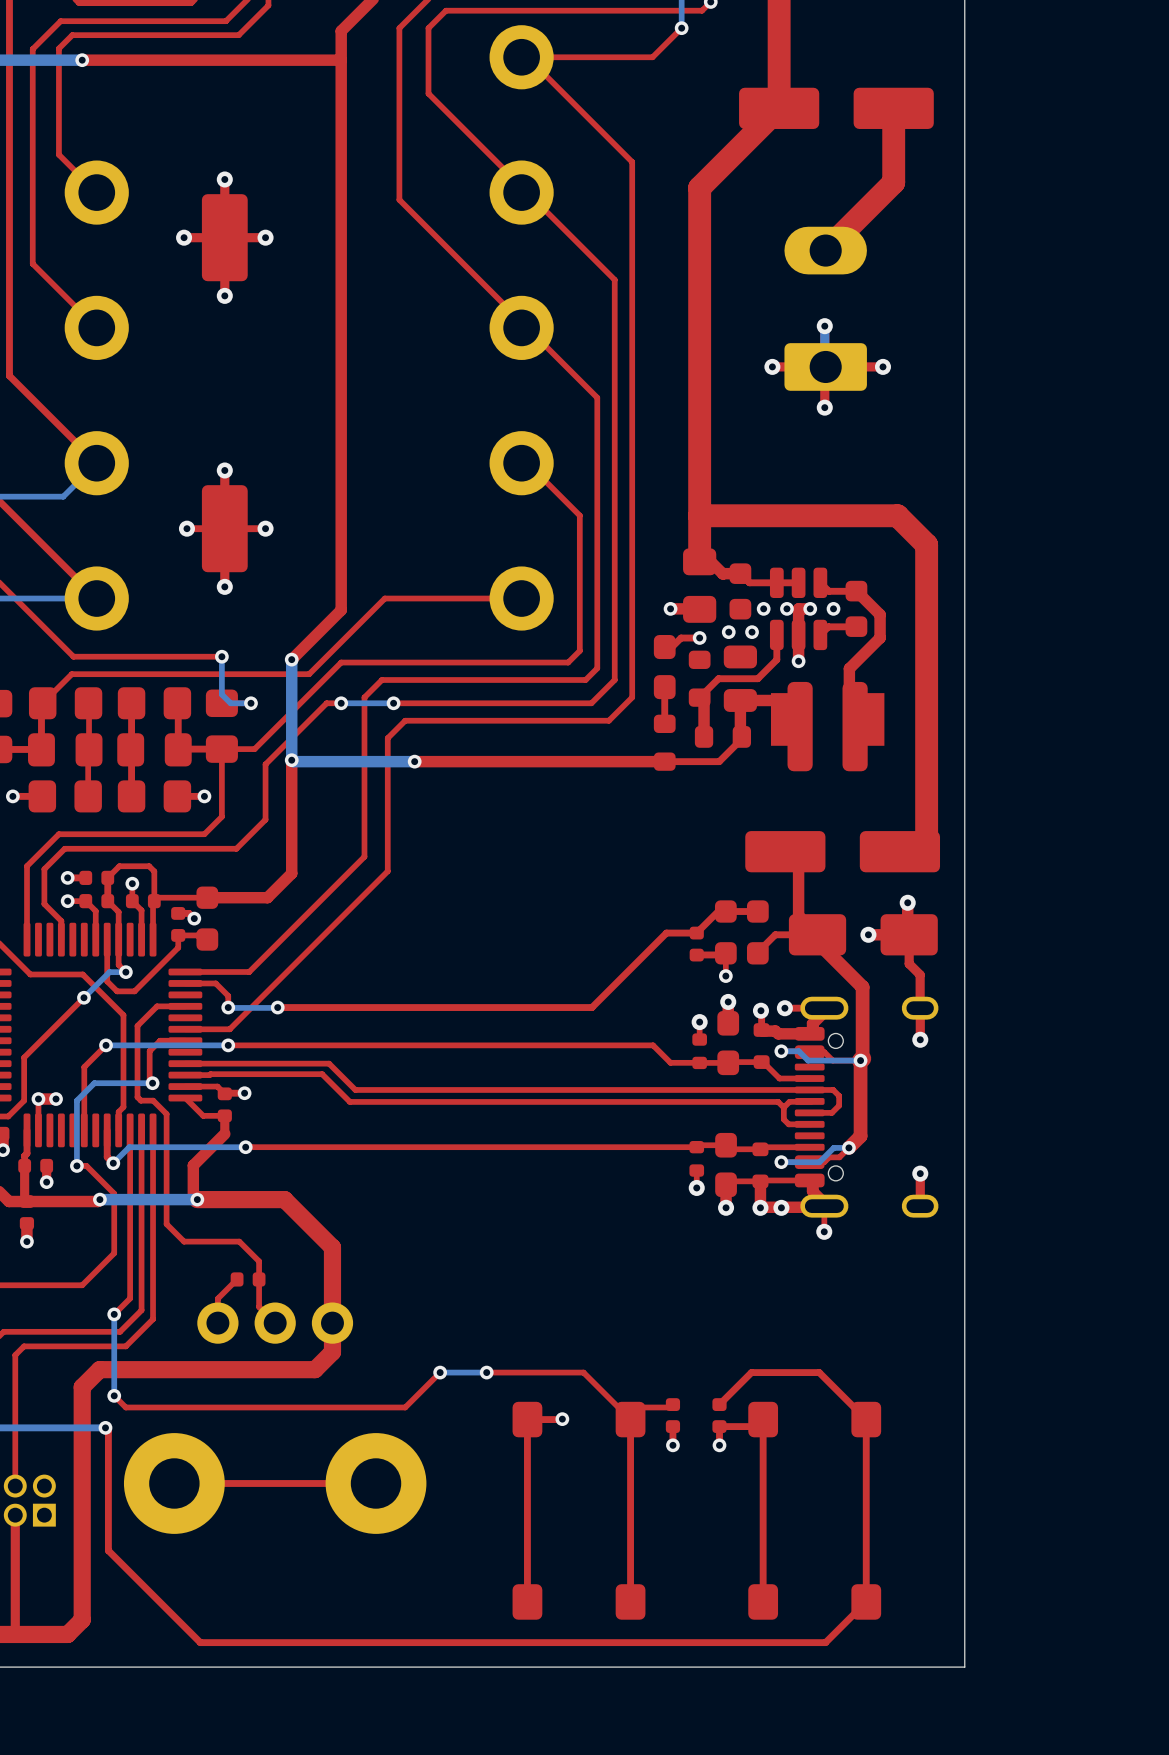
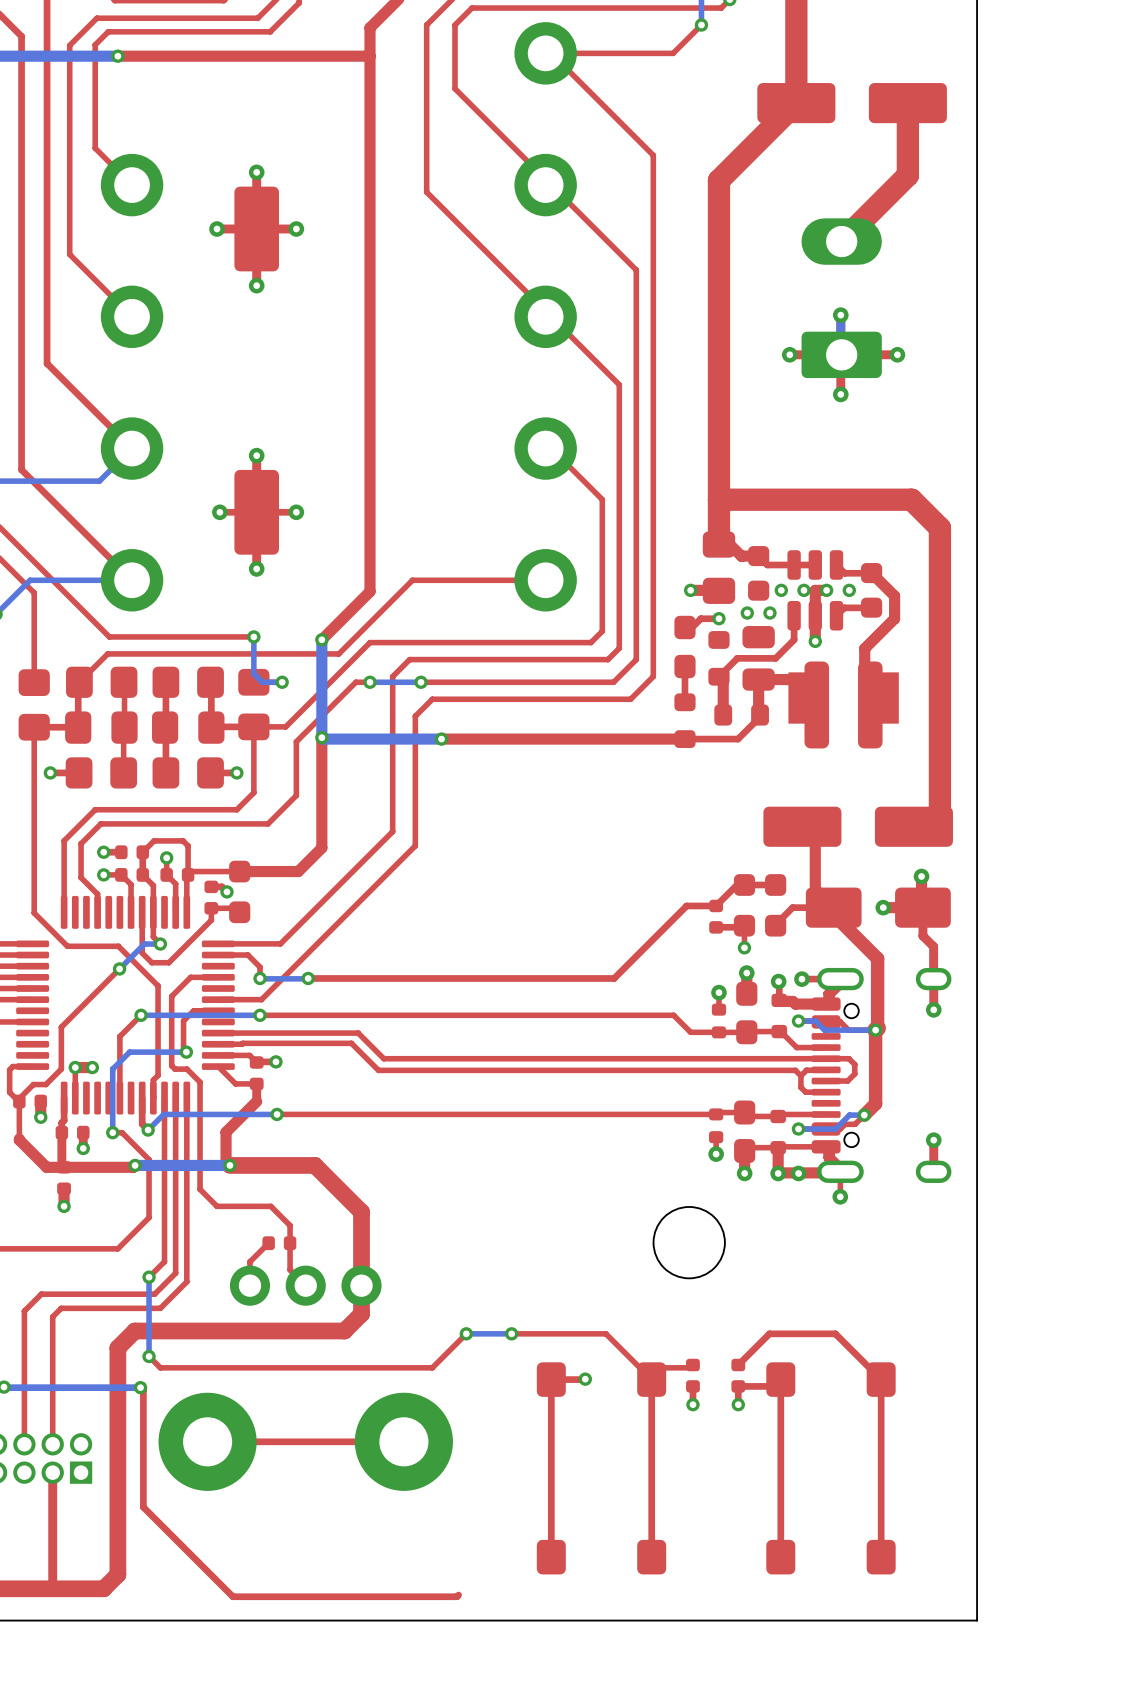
round board edge: none -> [652, 1206, 726, 1279]
top track: (866, 1601) (825, 1642) (430, 1642) -> (458, 1595) (456, 1596)

